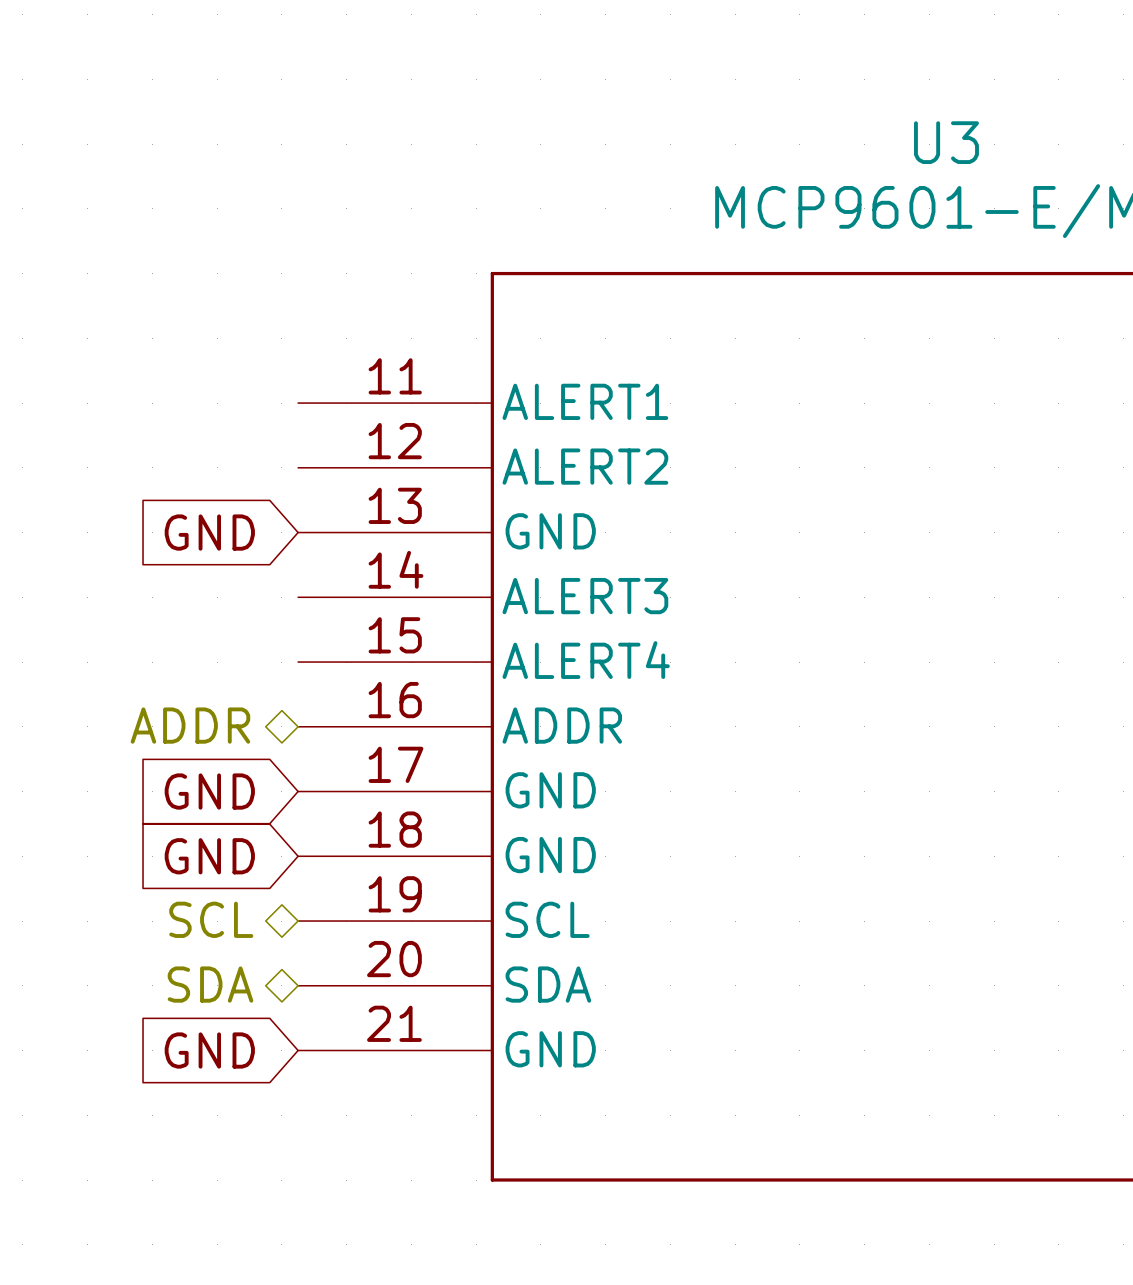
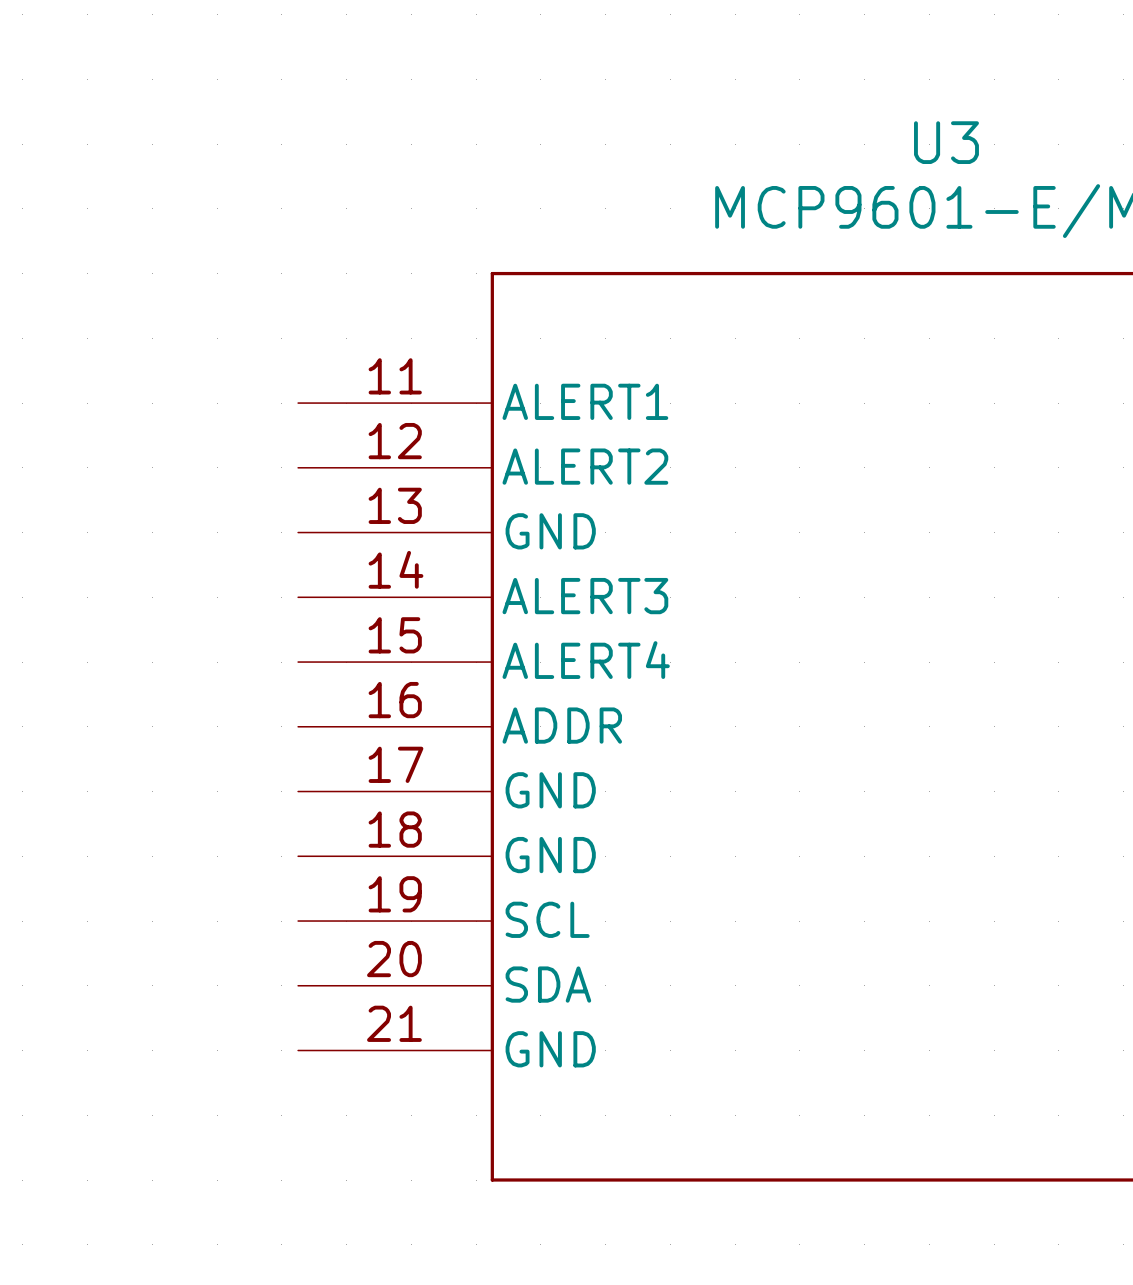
global label: GND (209, 532) -> none
hierarchical label: ADDR (190, 725) -> none
global label: GND (209, 791) -> none
global label: GND (209, 856) -> none
hierarchical label: SCL (211, 919) -> none
hierarchical label: SDA (210, 984) -> none
global label: GND (209, 1050) -> none

